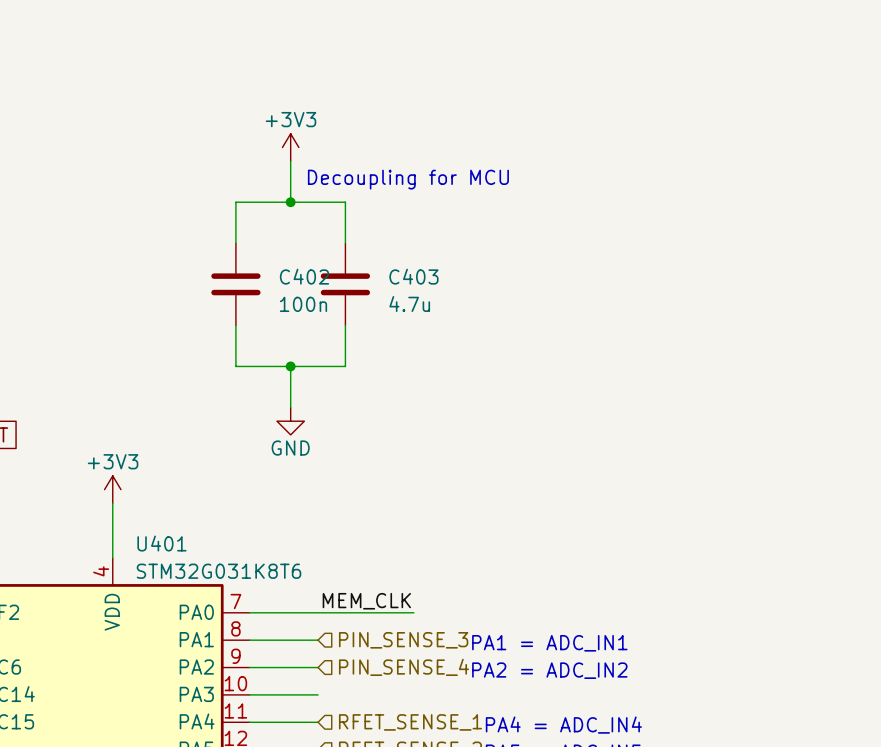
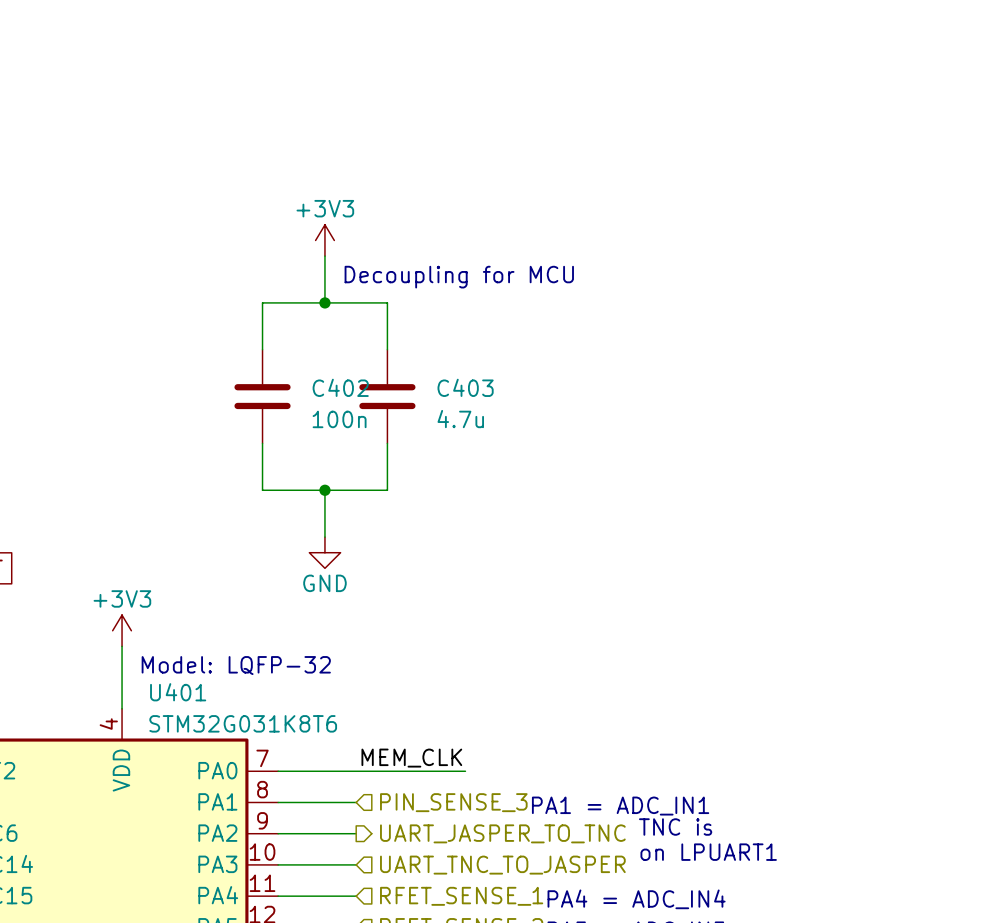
text: none -> Model: LQFP-32 (236, 665)
text: none -> TNC is (675, 827)
hierarchical label shape: input (403, 667) -> output (502, 833)
hierarchical label: PIN_SENSE_4 (403, 667) -> UART_JASPER_TO_TNC (502, 833)
text: PA2 = ADC_IN2 (549, 670) -> none
text: none -> on LPUART1 (708, 852)
hierarchical label: none -> UART_TNC_TO_JASPER (502, 865)

